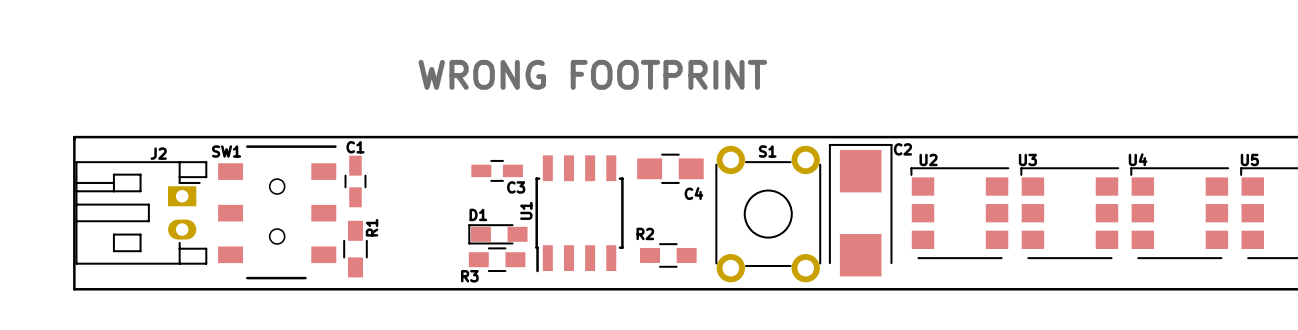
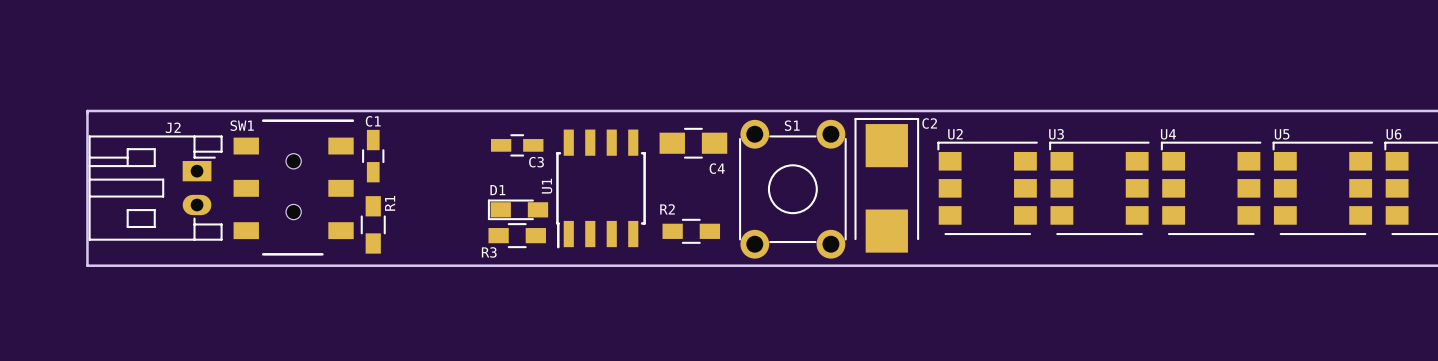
text: WRONG FOOTPRINT (592, 74) -> none

